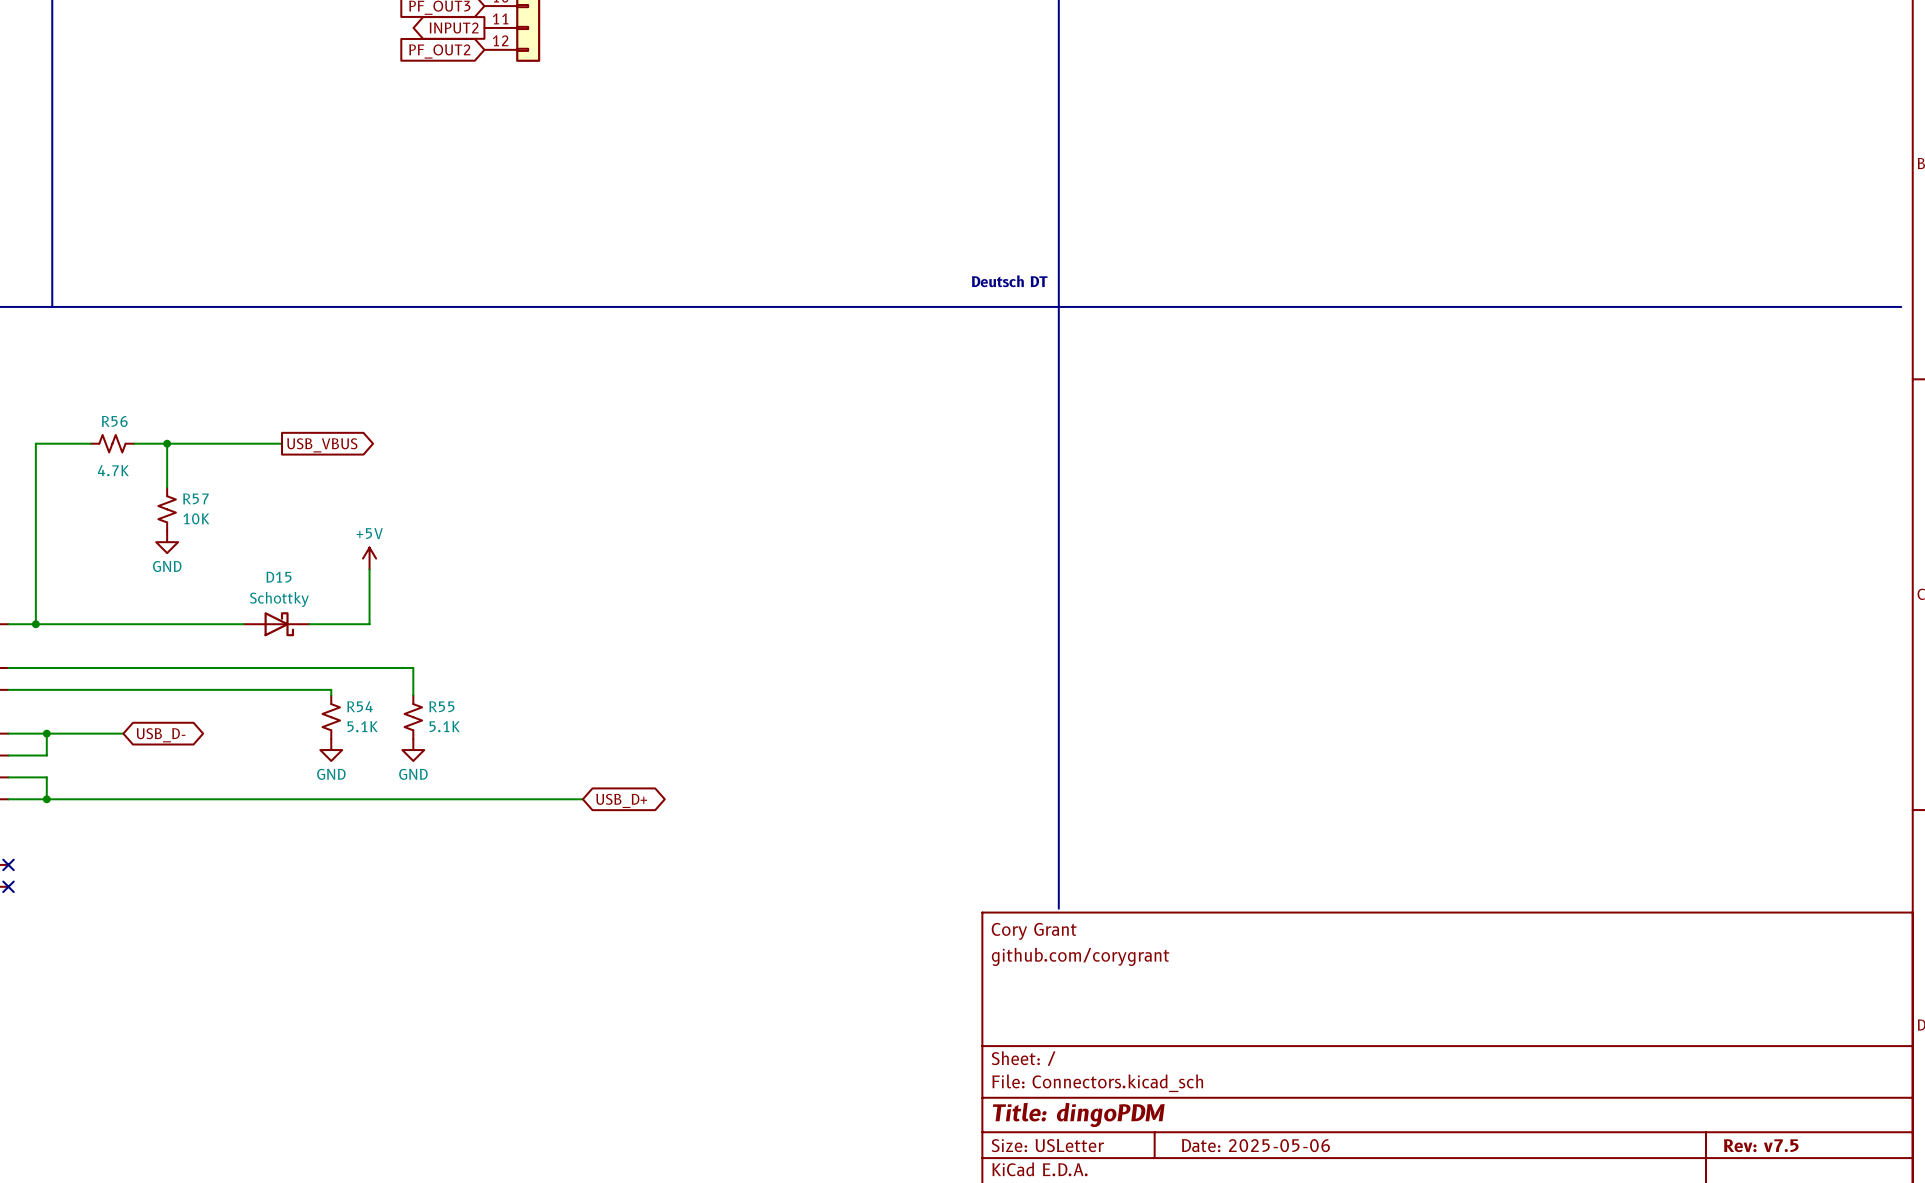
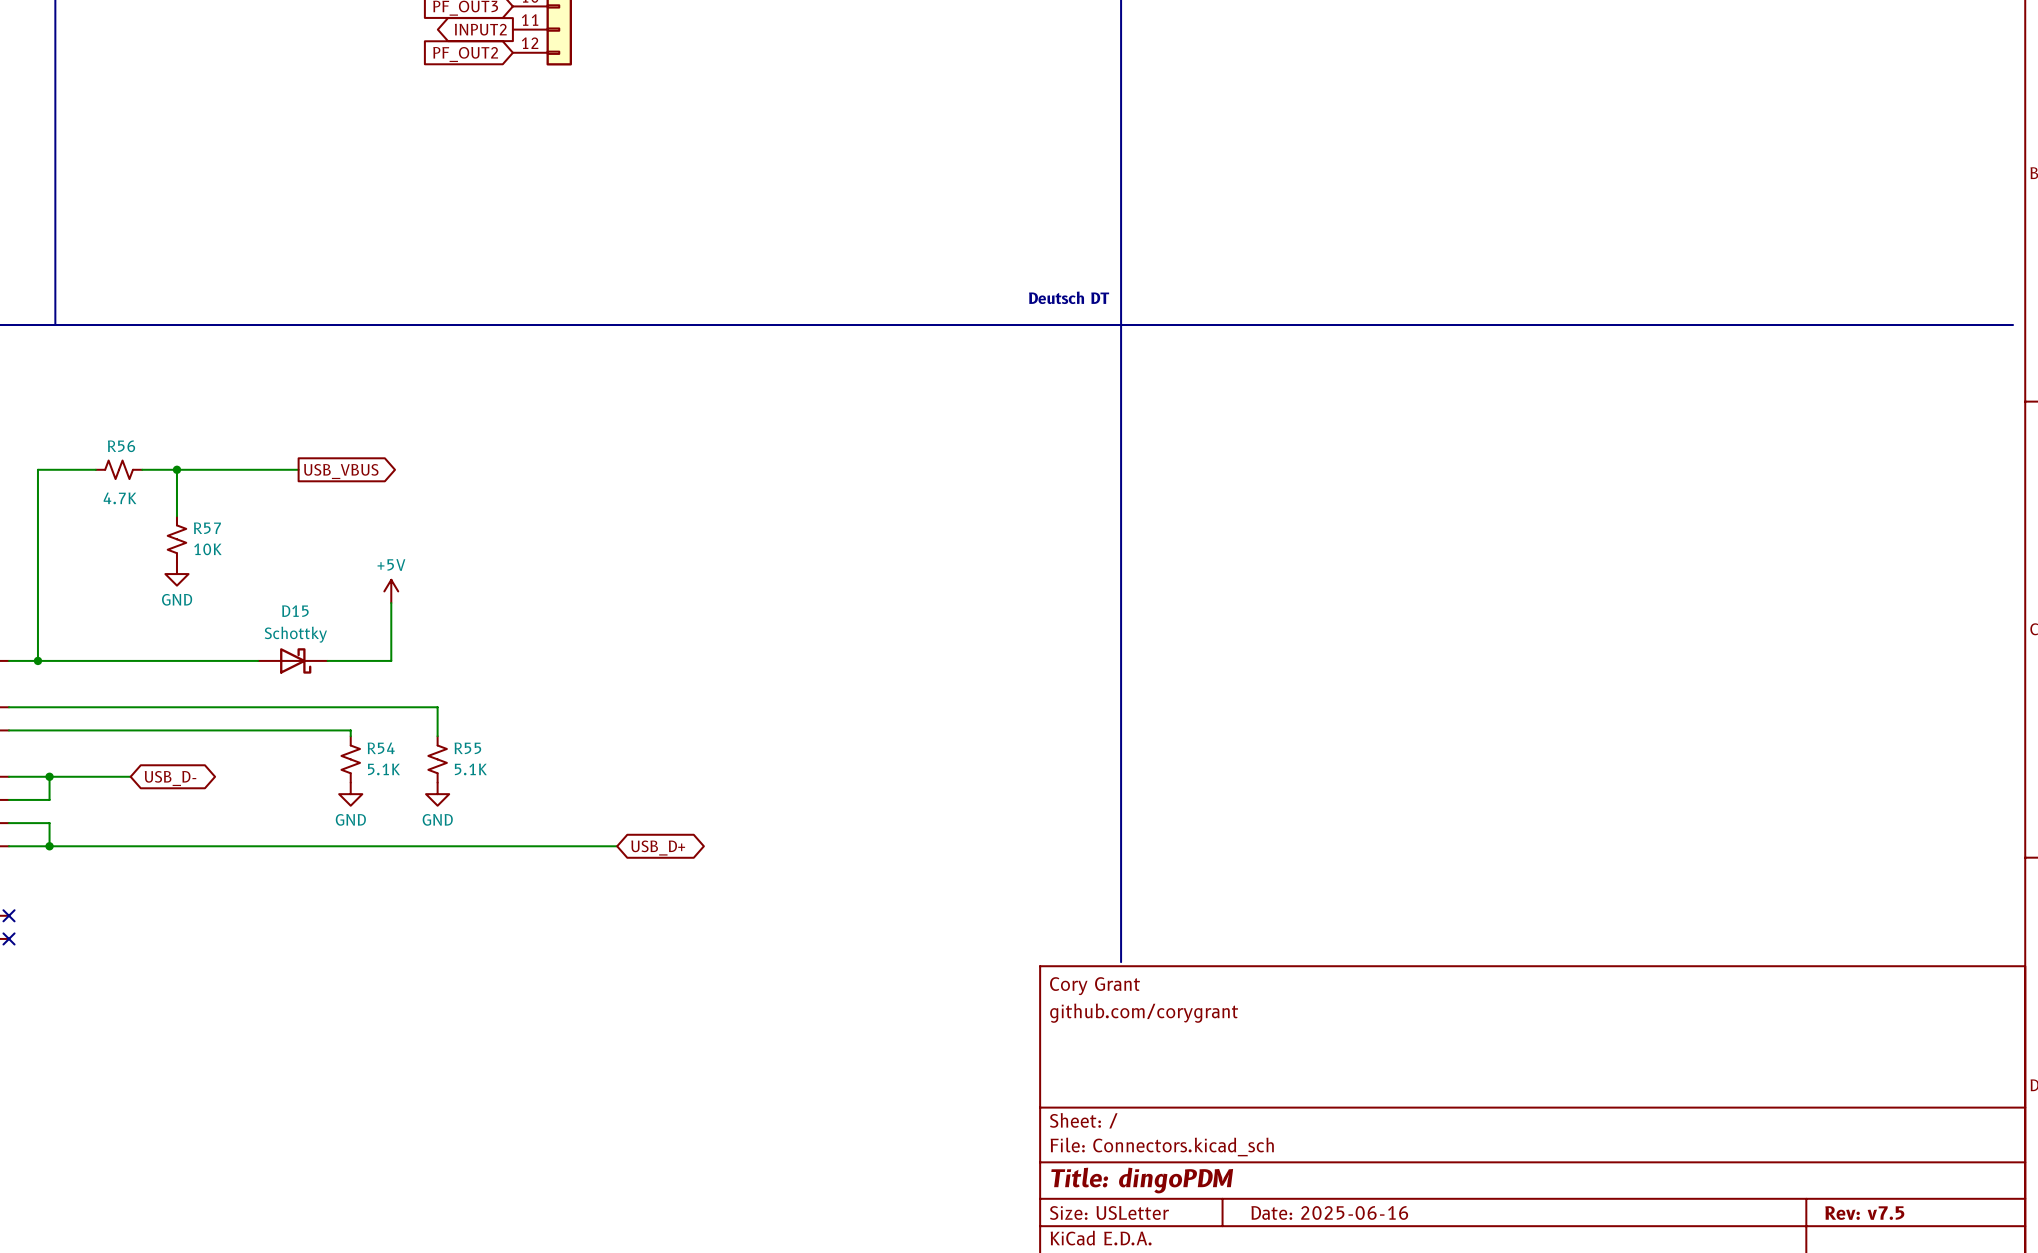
title block: Date: 2025-05-06 (1255, 1145) -> Date: 2025-06-16 (1329, 1212)

